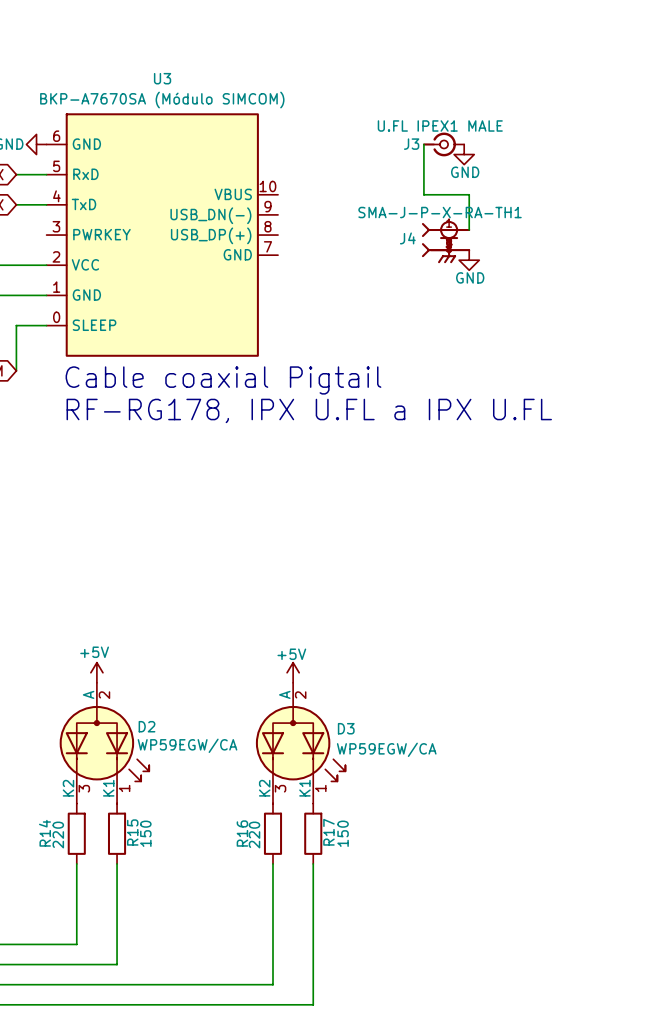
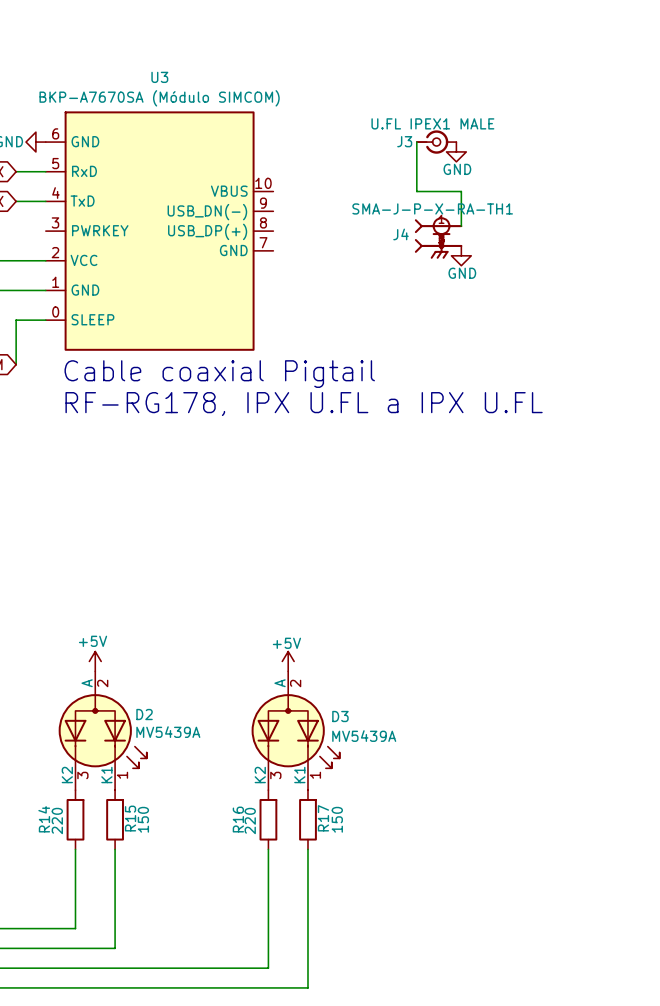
D2 value: WP59EGW/CA (187, 745) -> MV5439A (168, 732)
D3 value: WP59EGW/CA (386, 749) -> MV5439A (364, 736)

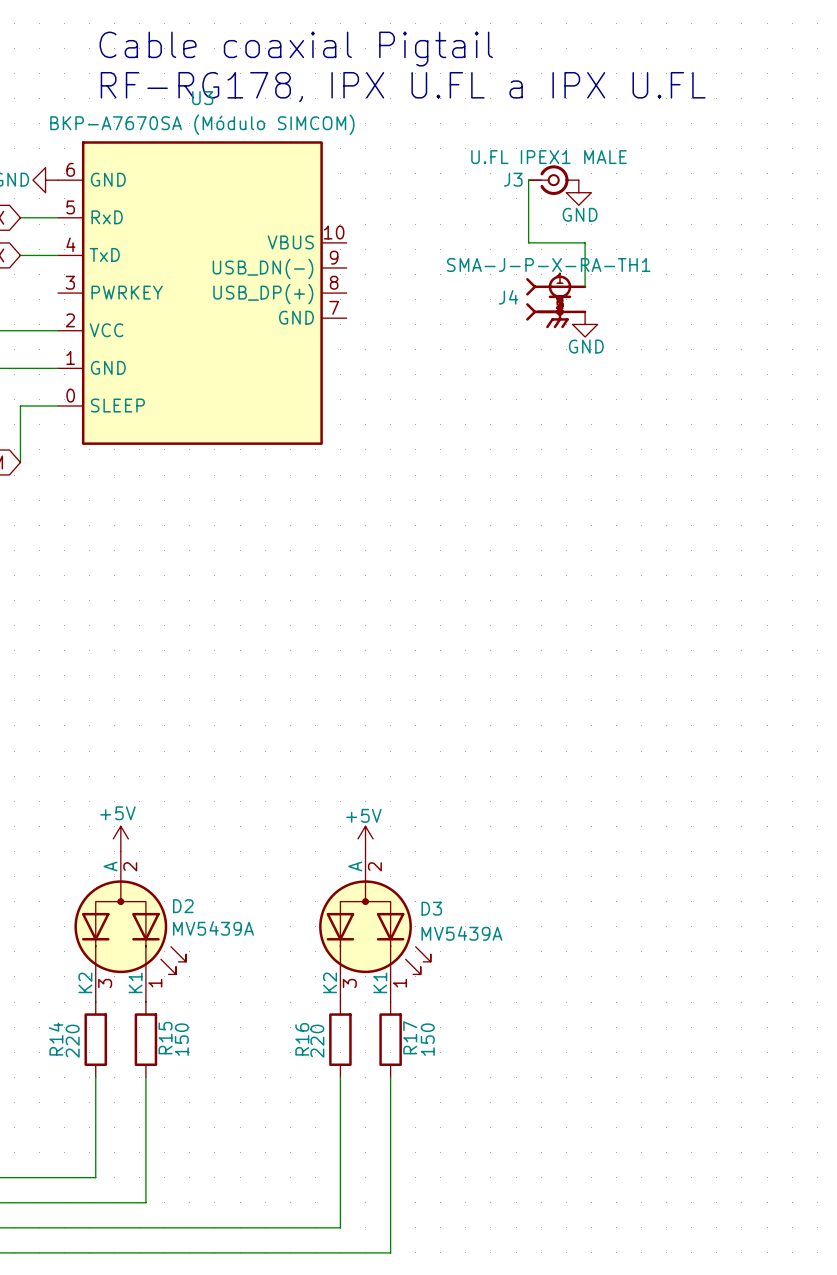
text: none -> Cable coaxial Pigtail (296, 49)
text: none -> RF-RG178, IPX U.FL a IPX U.FL (403, 87)
text: Cable coaxial Pigtail (219, 374) -> none
text: RF-RG178, IPX U.FL a IPX U.FL (304, 404) -> none

